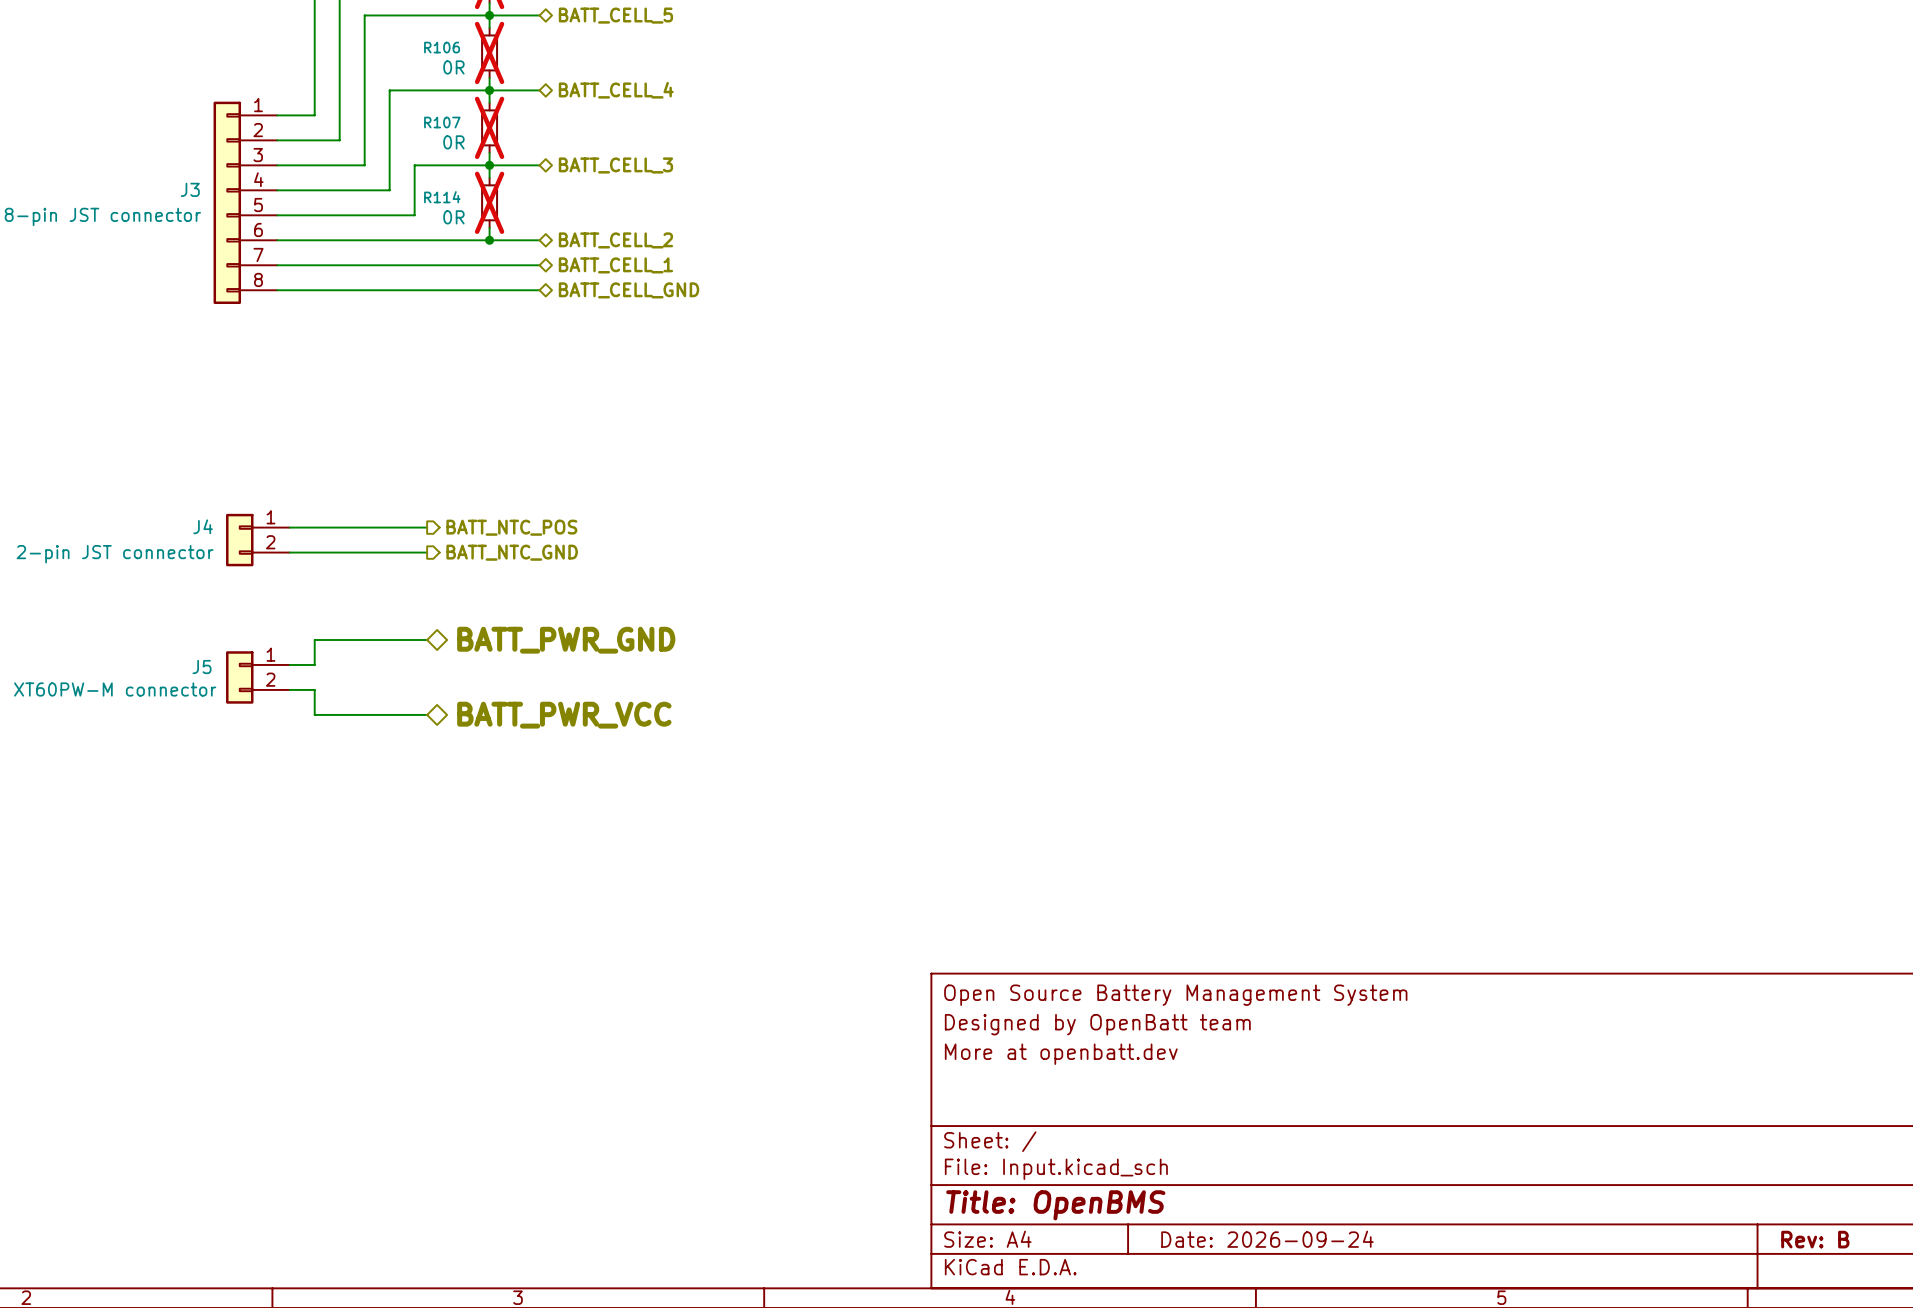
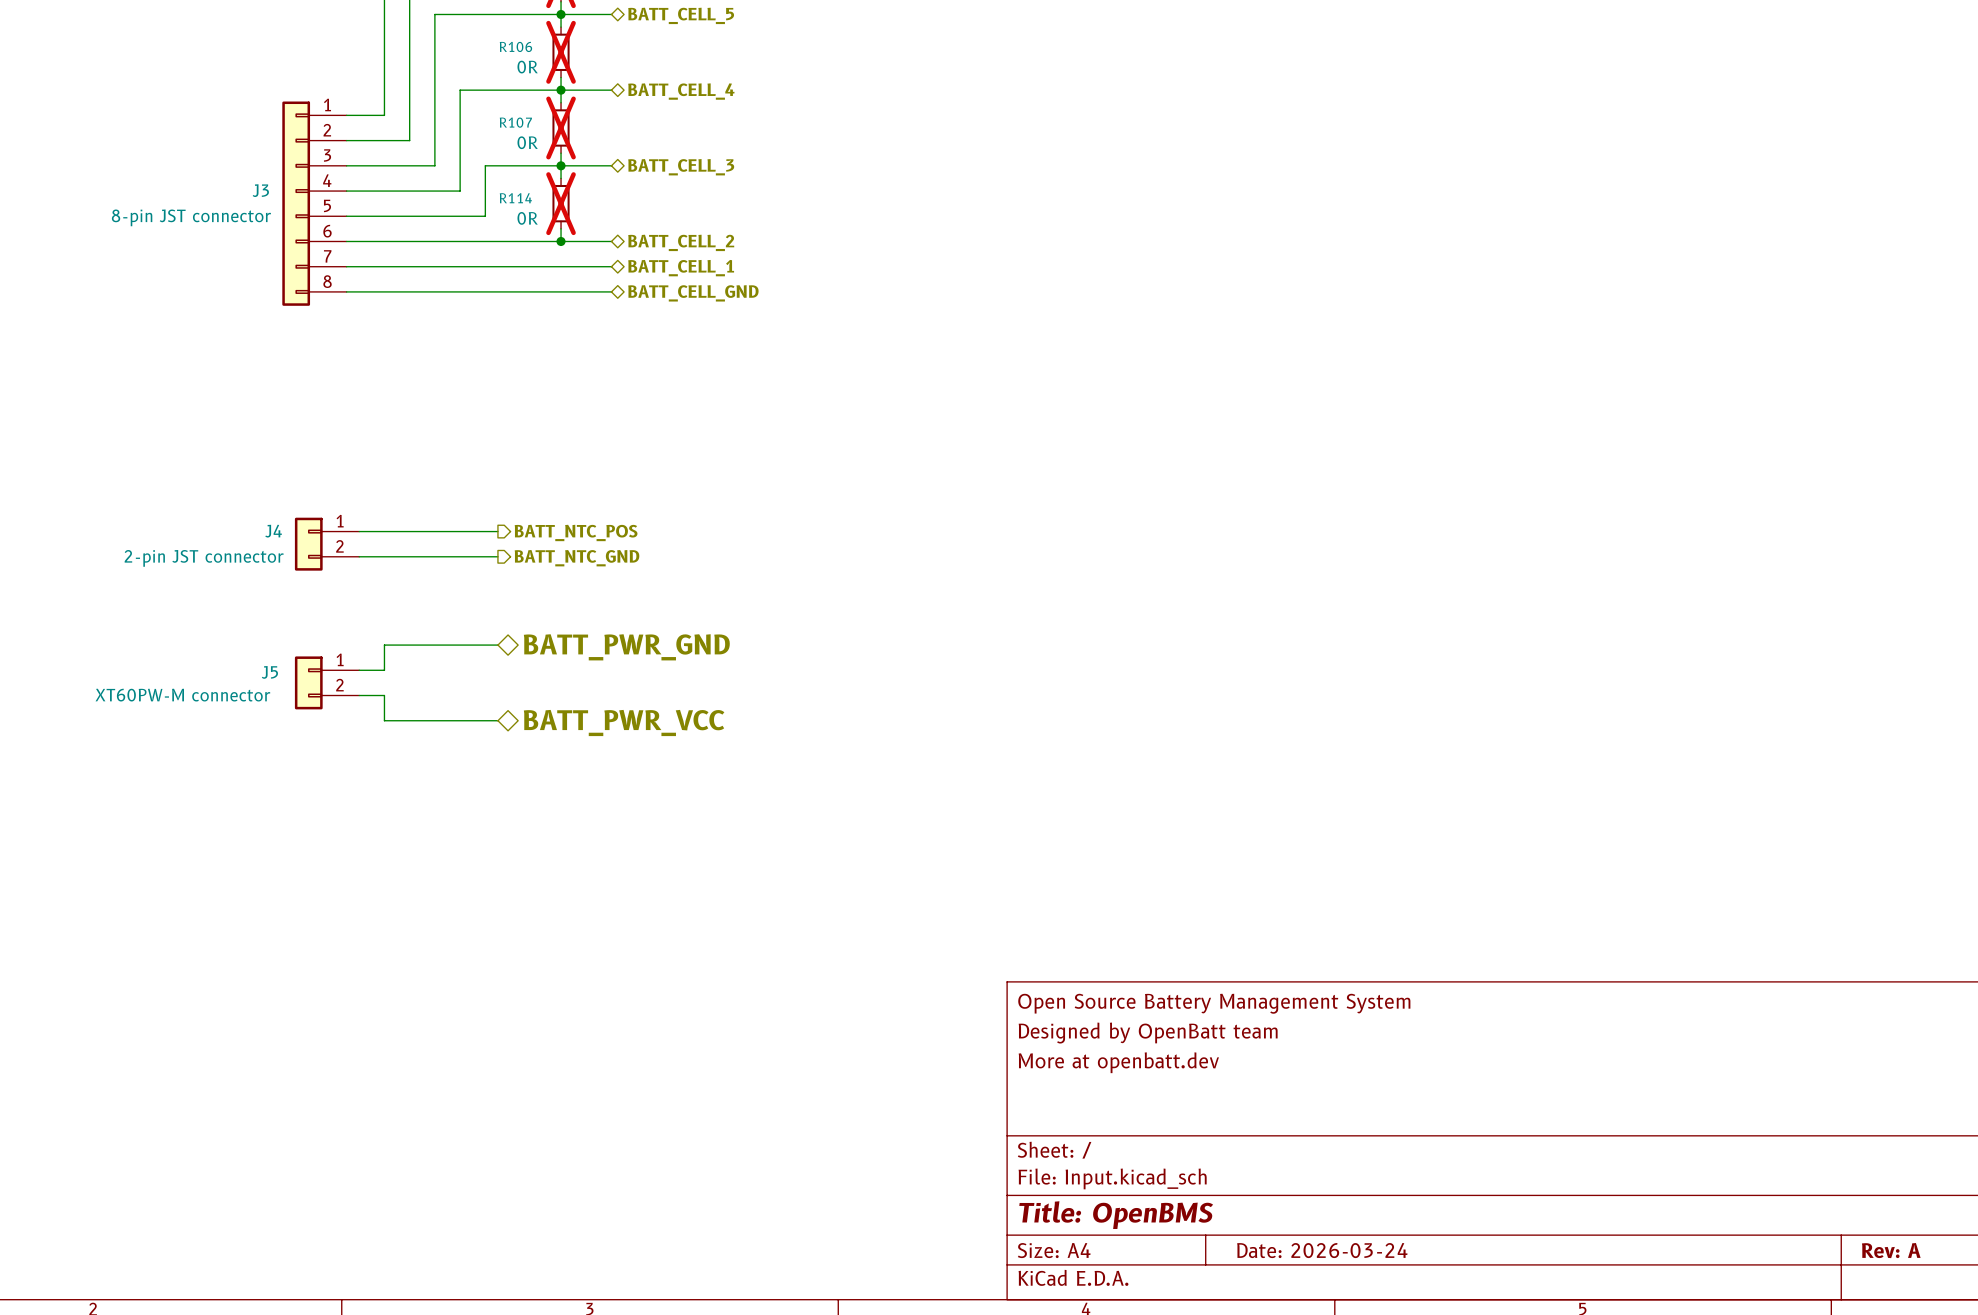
title block: Date: 2026-09-24 (1267, 1239) -> Date: 2026-03-24 (1322, 1250)
title block: Rev: B (1815, 1239) -> Rev: A (1891, 1250)

